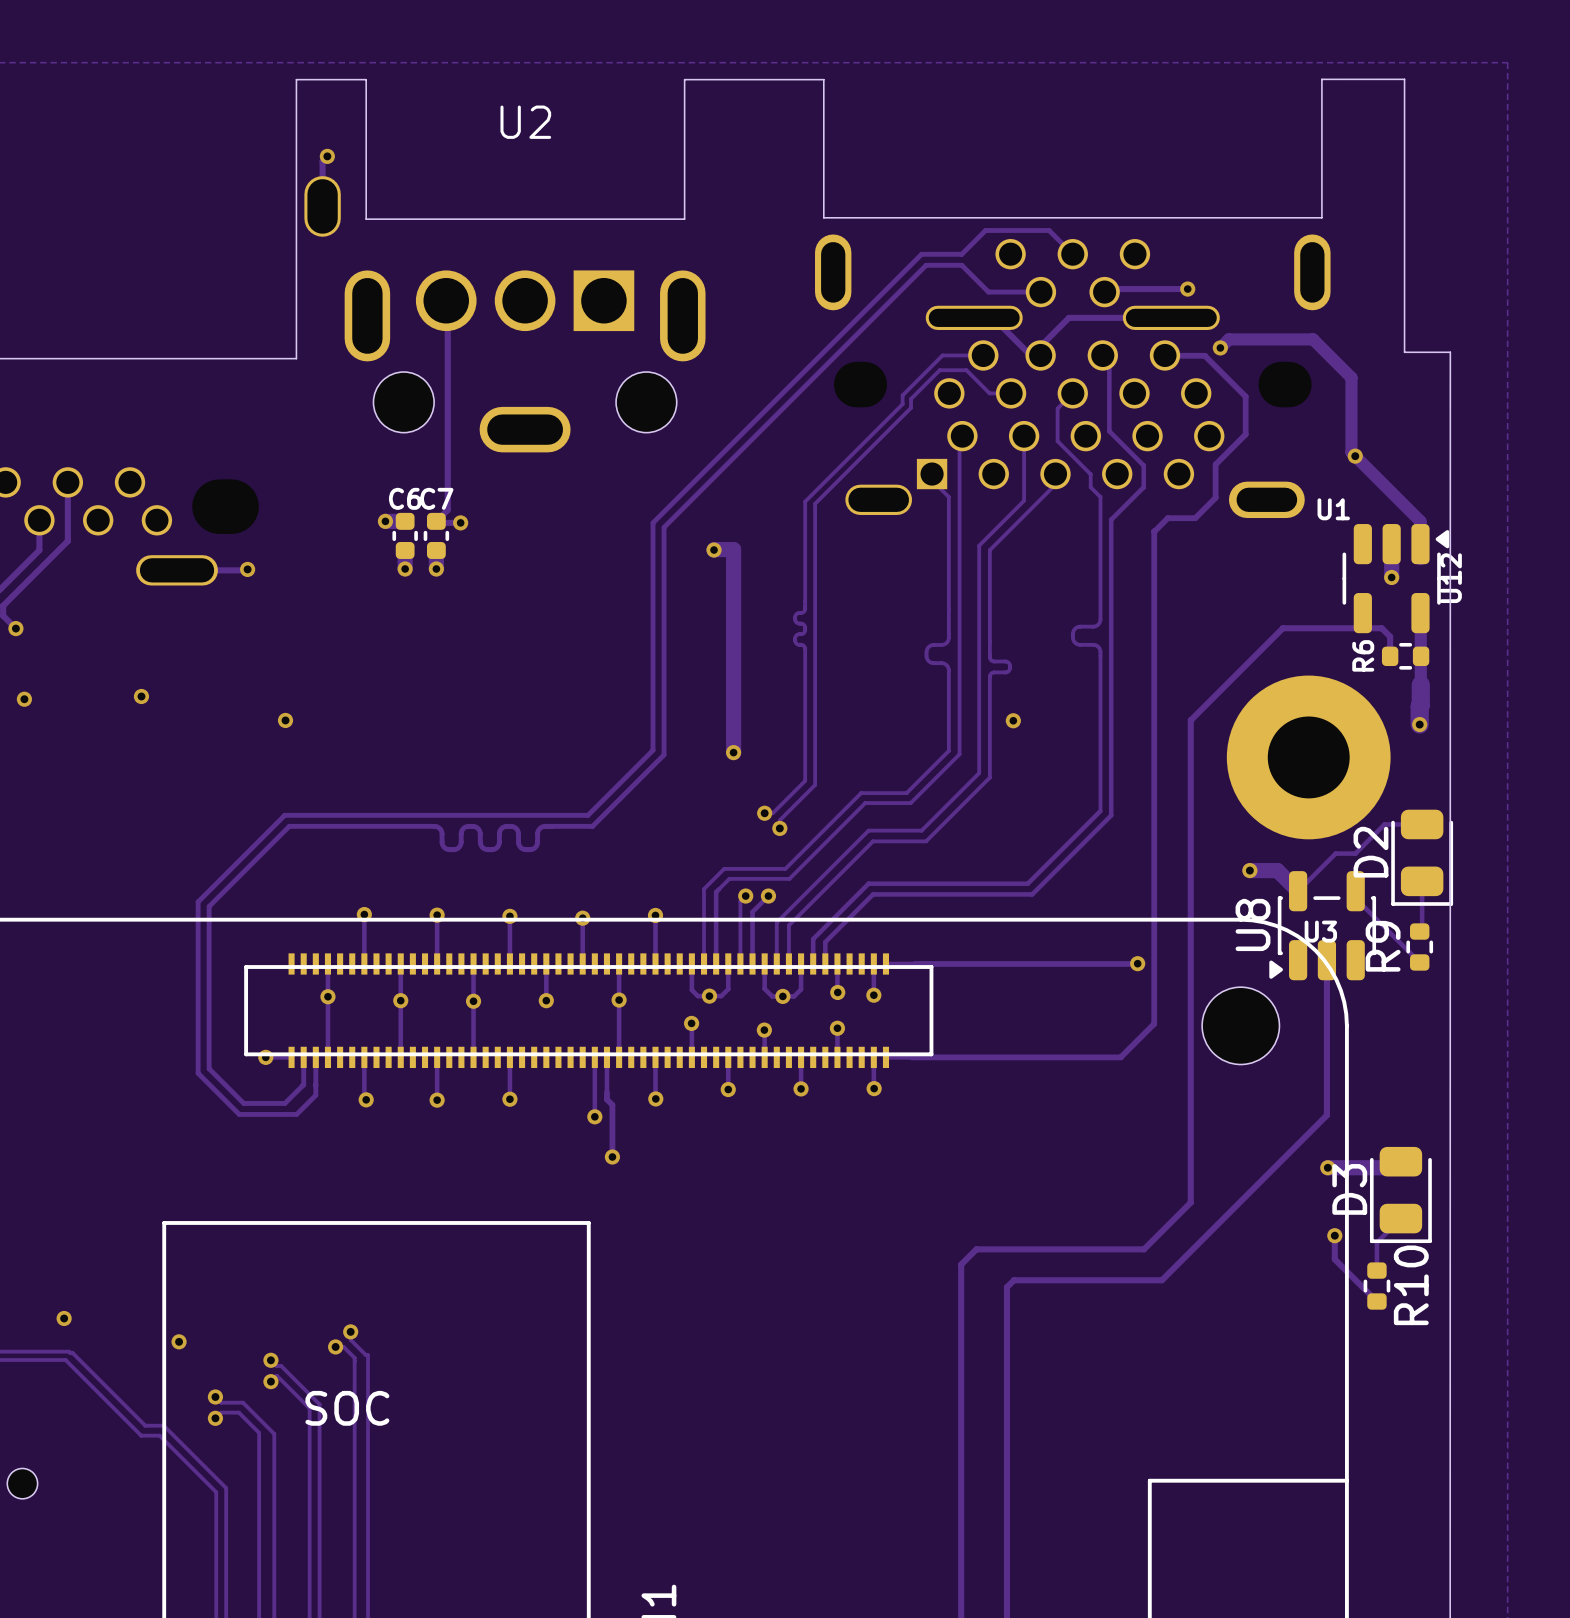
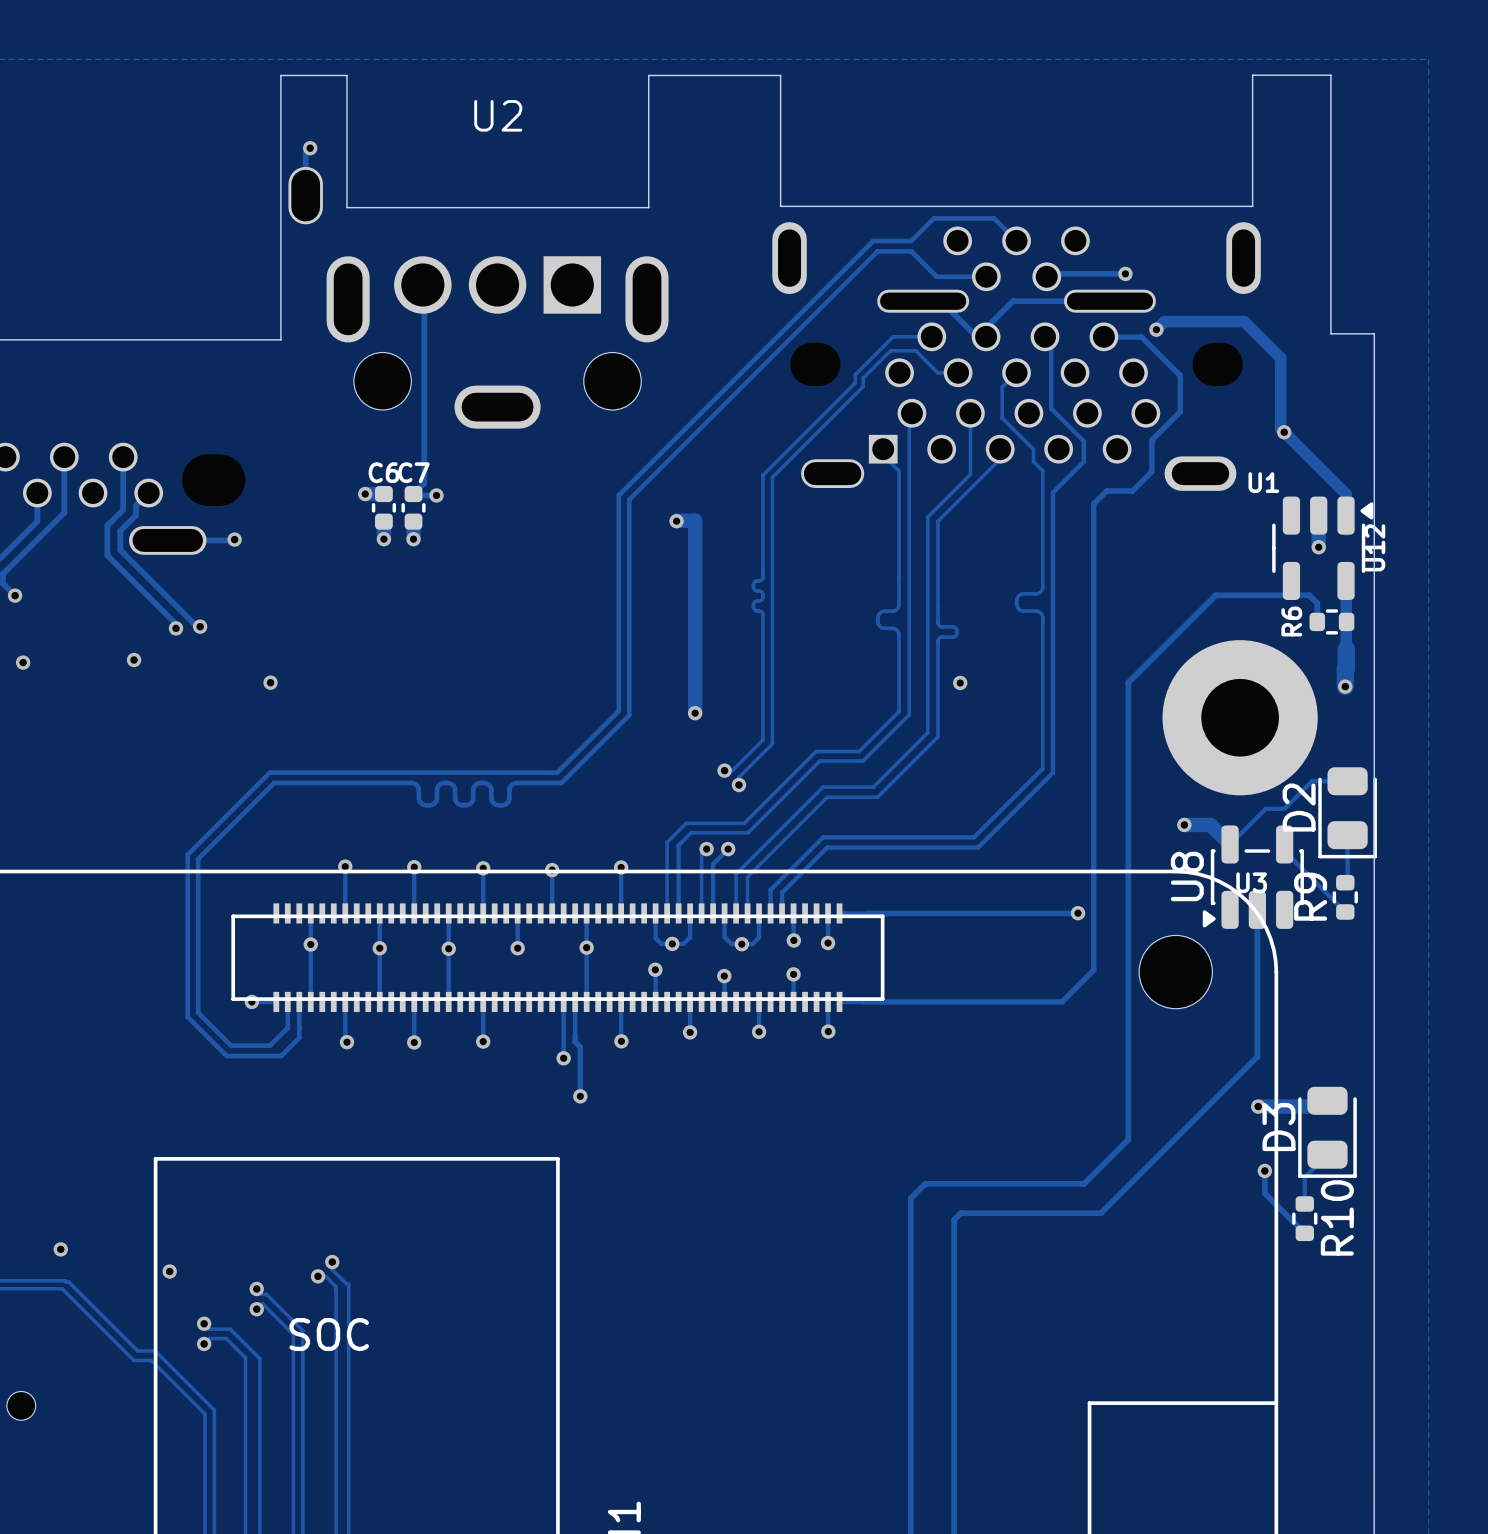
track: none -> (123, 457) (123, 509) (107, 525) (107, 555) (176, 623) (176, 628)
track: none -> (148, 493) (136, 505) (136, 515) (120, 530) (120, 549) (196, 626) (200, 626)
via: none -> (200, 626)
via: none -> (176, 628)

